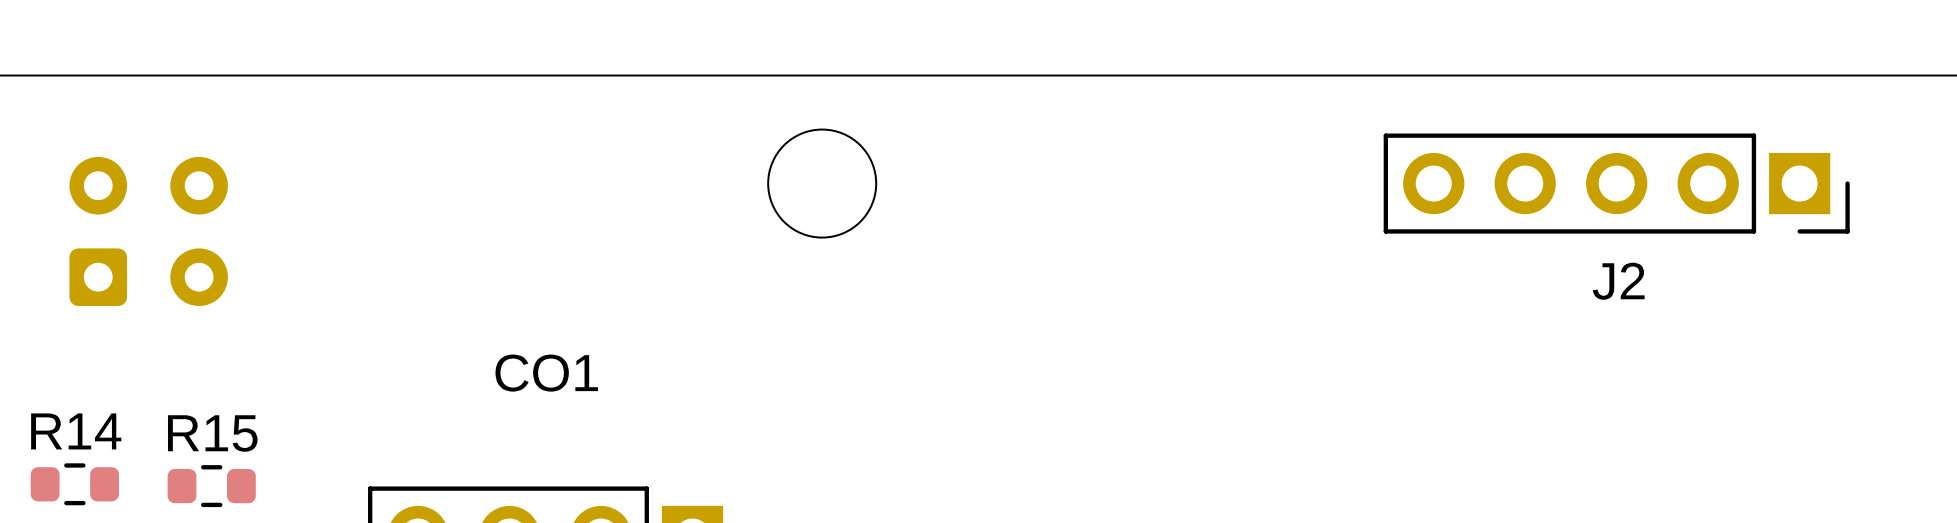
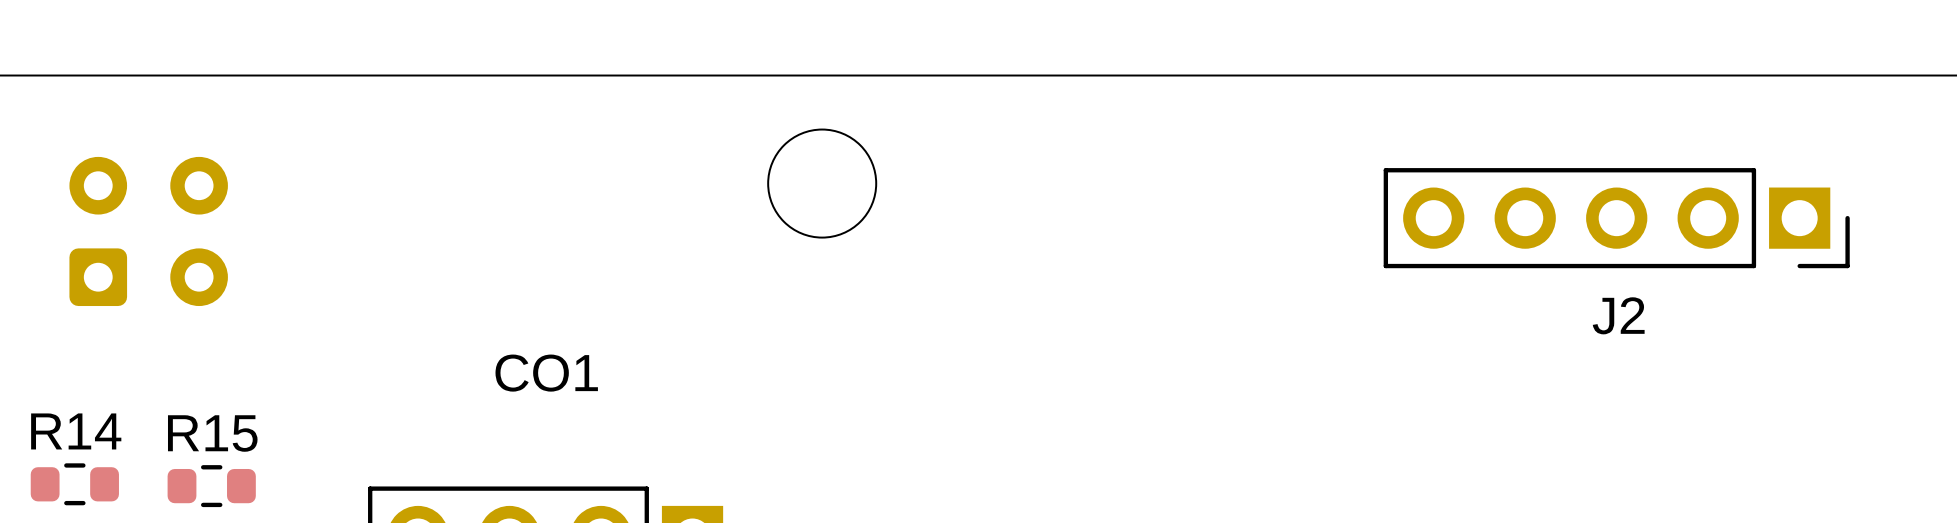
J2 position: (1616, 183) -> (1616, 218)

